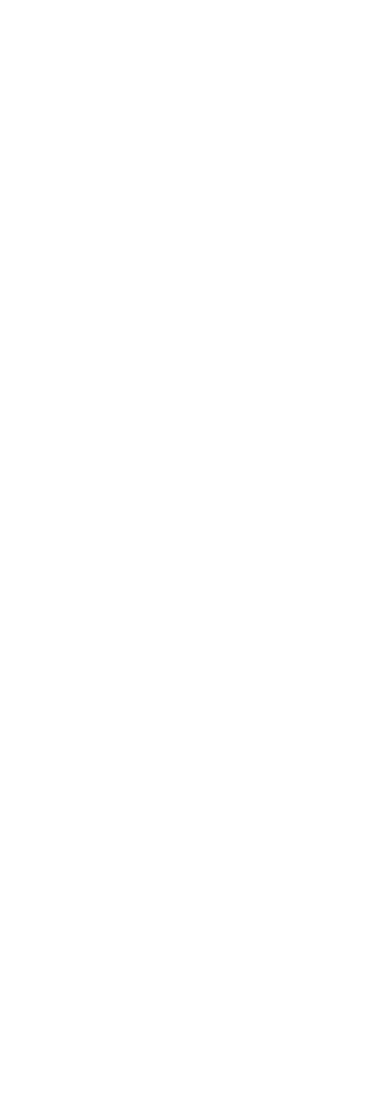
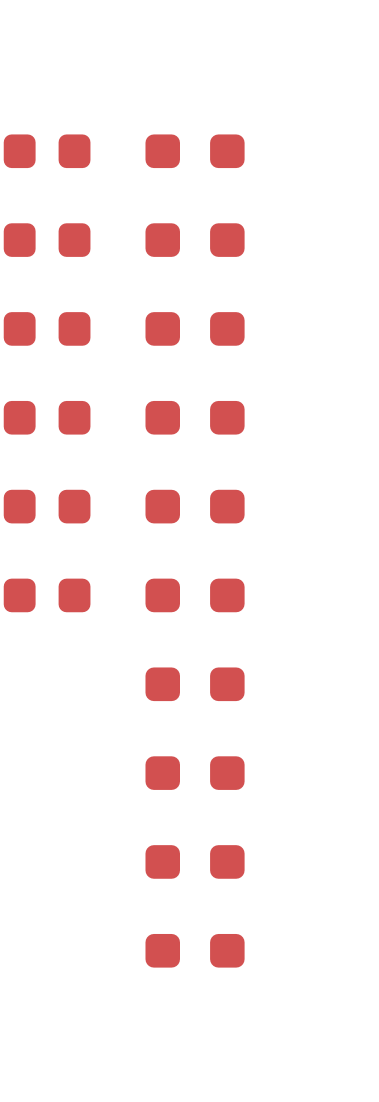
part: none -> (47, 151)
part: none -> (195, 151)
part: none -> (47, 240)
part: none -> (195, 240)
part: none -> (47, 328)
part: none -> (195, 328)
part: none -> (47, 417)
part: none -> (195, 417)
part: none -> (47, 506)
part: none -> (195, 506)
part: none -> (47, 595)
part: none -> (195, 595)
part: none -> (195, 684)
part: none -> (195, 773)
part: none -> (195, 861)
part: none -> (195, 950)

